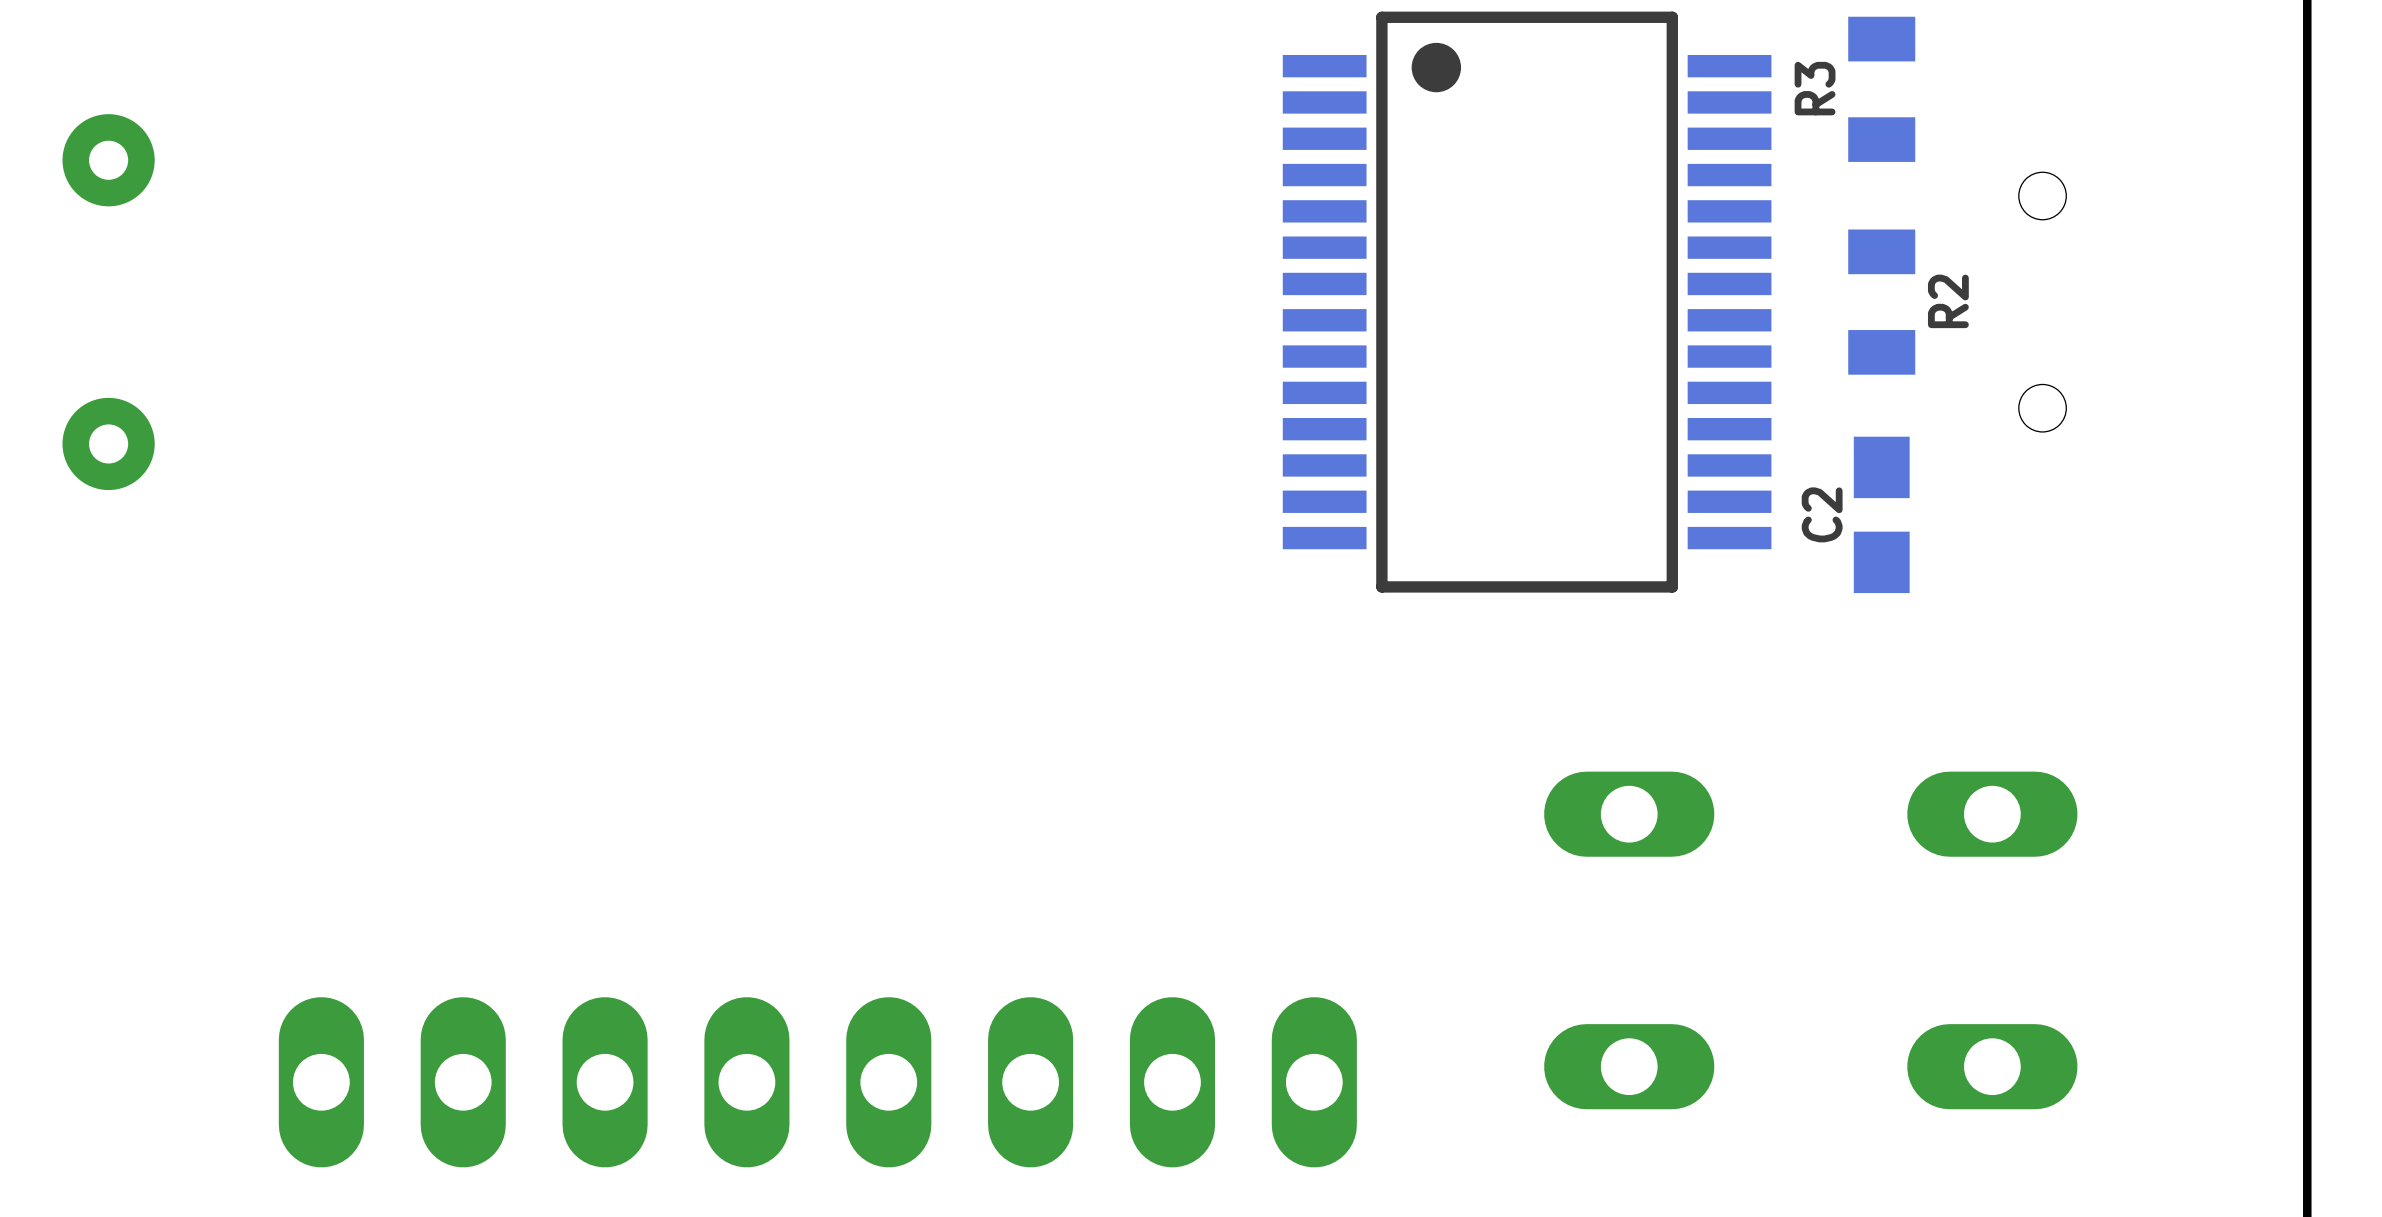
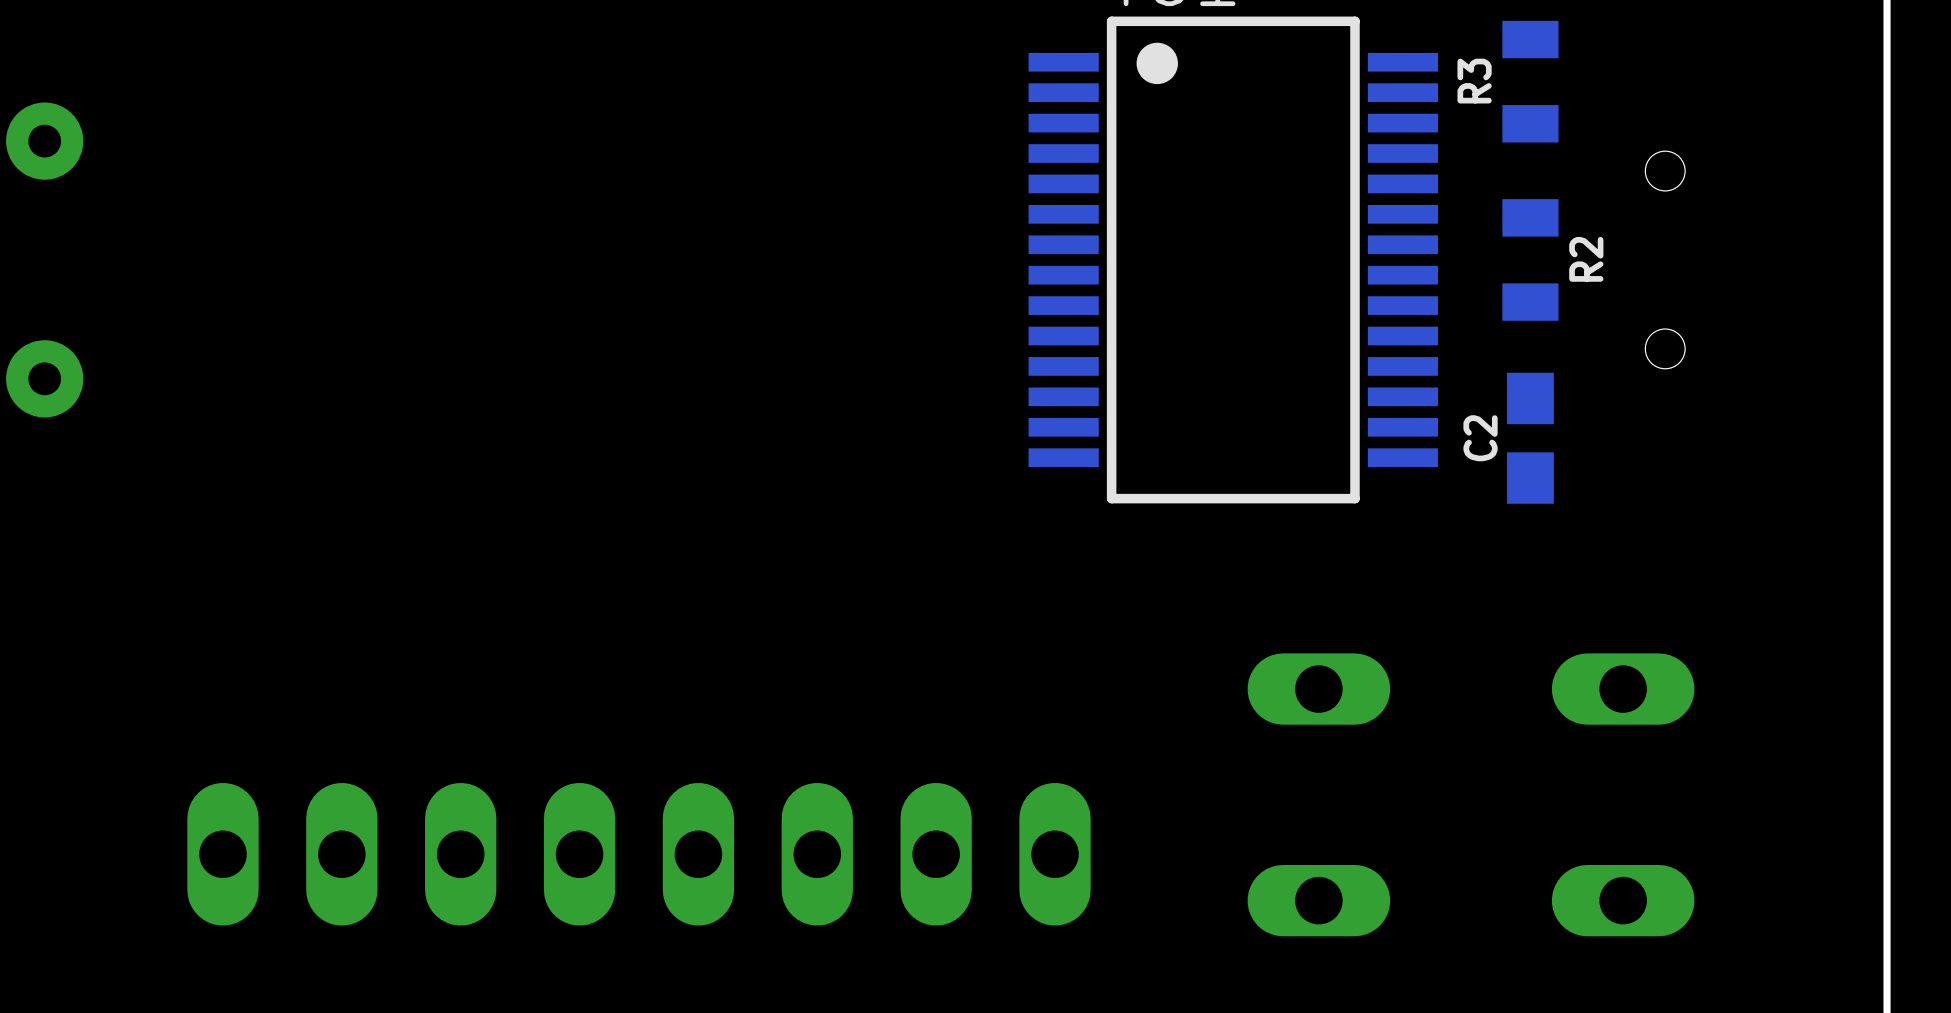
part position: (817, 1082) -> (639, 854)

